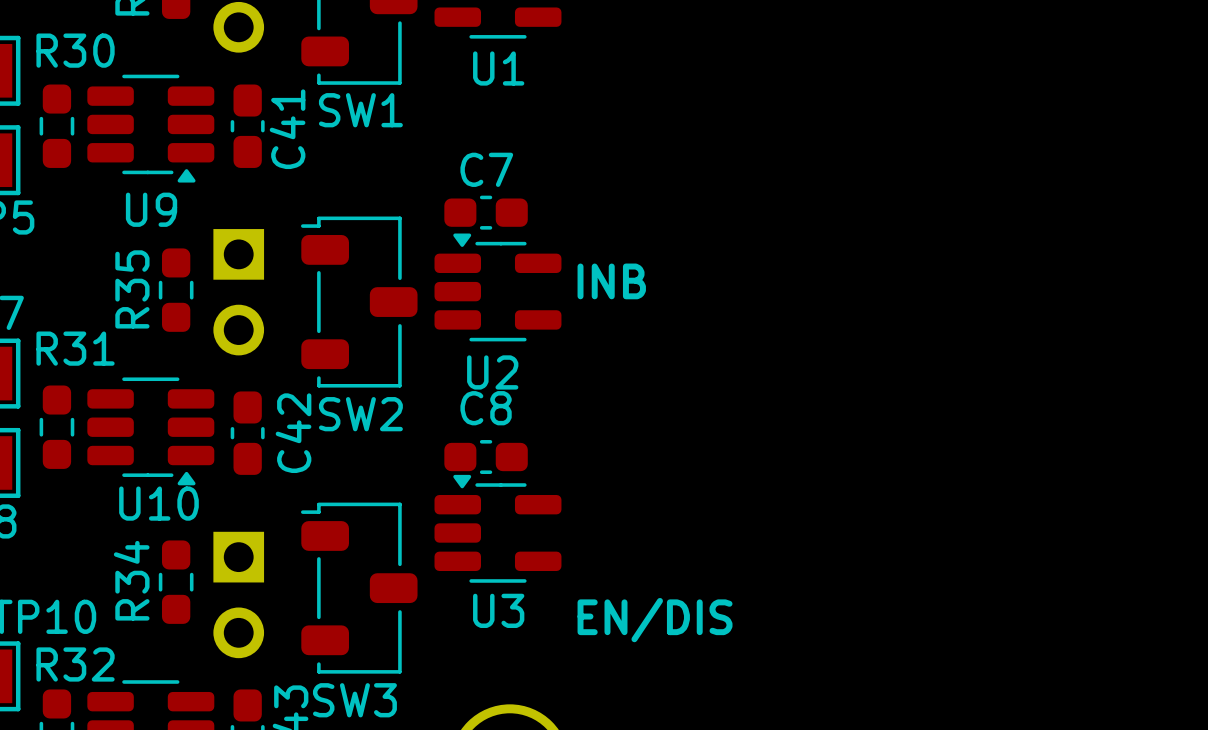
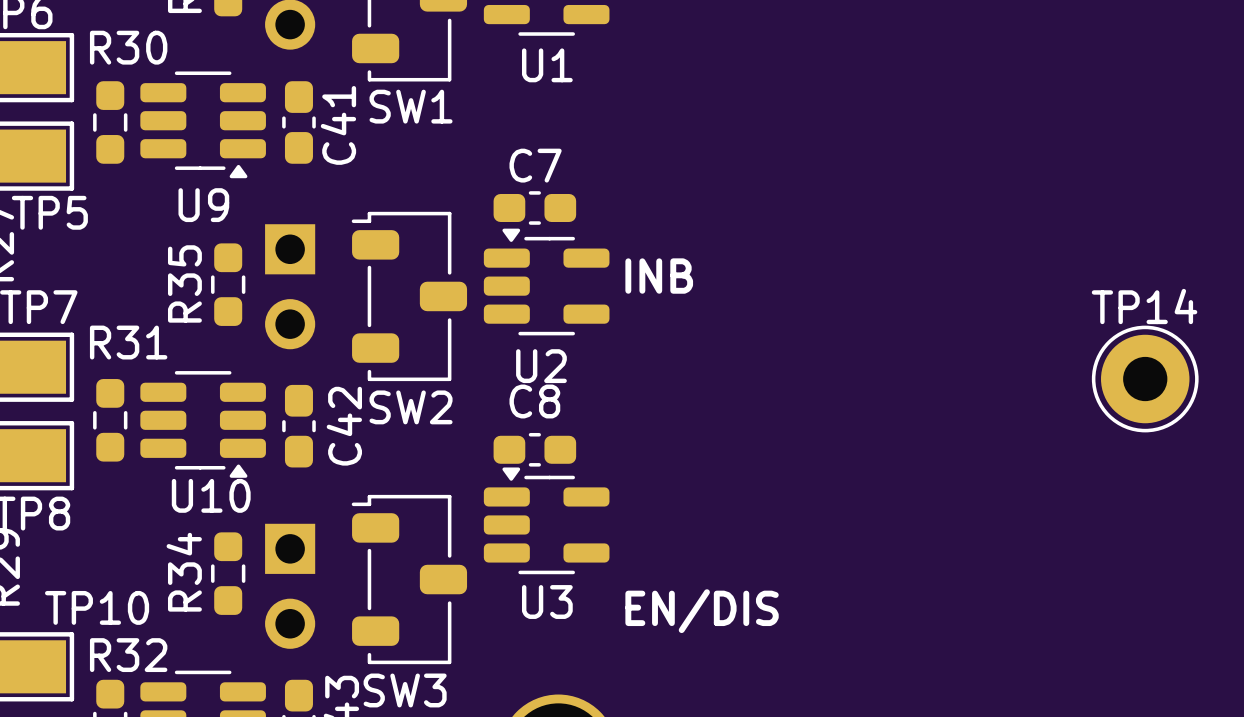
TP14: none -> (1145, 379)

